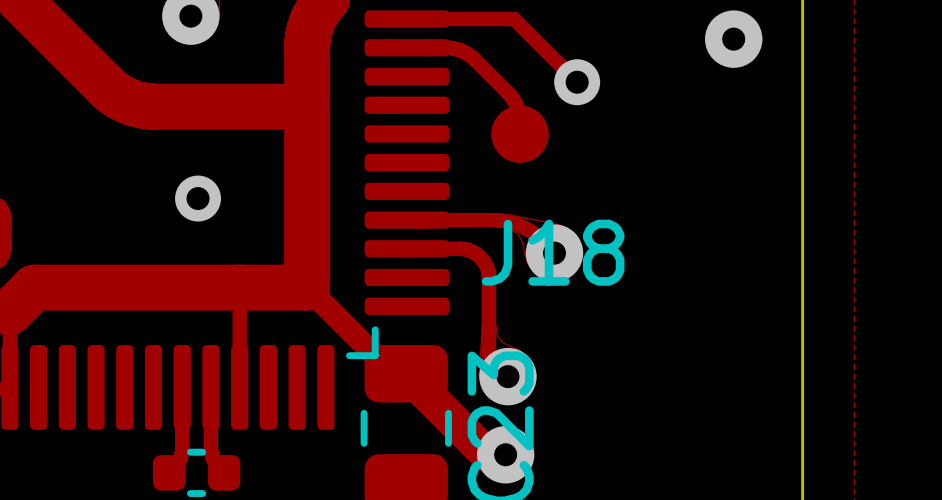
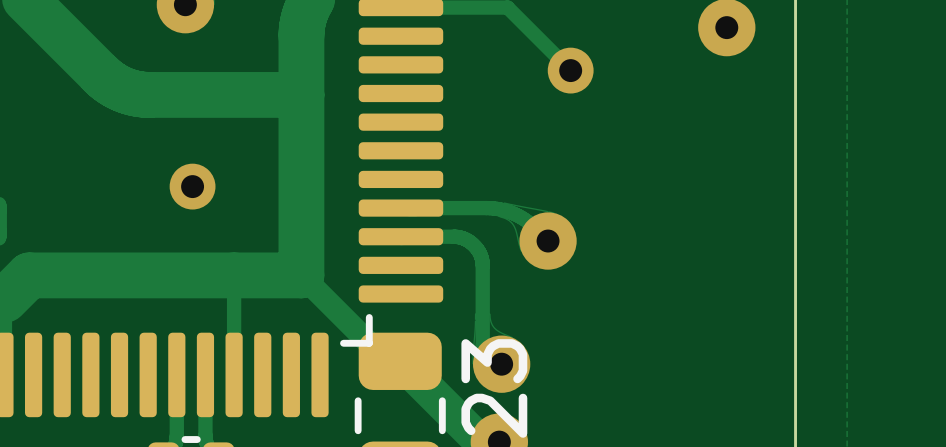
track: (406, 47) (451, 48) (470, 55) (513, 99) (519, 114) (520, 134) -> none
J18: (520, 134) -> none

